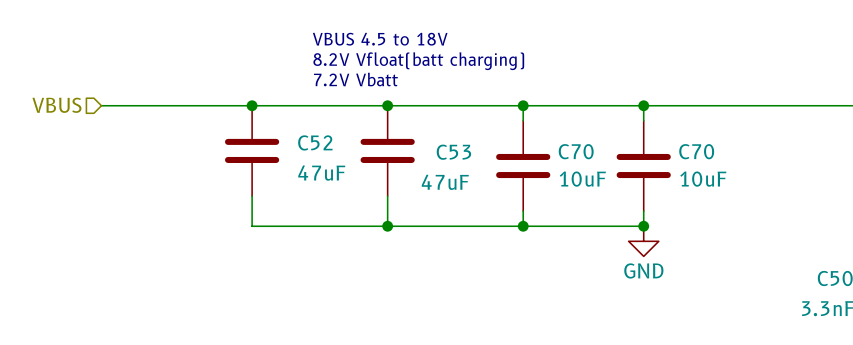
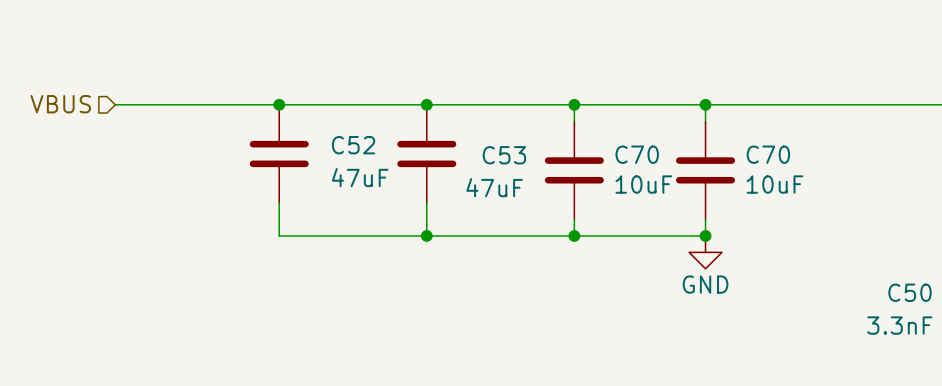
text: VBUS 4.5 to 18V (380, 39) -> none
text: 8.2V Vfloat(batt charging) (418, 61) -> none
text: 7.2V Vbatt (355, 79) -> none

